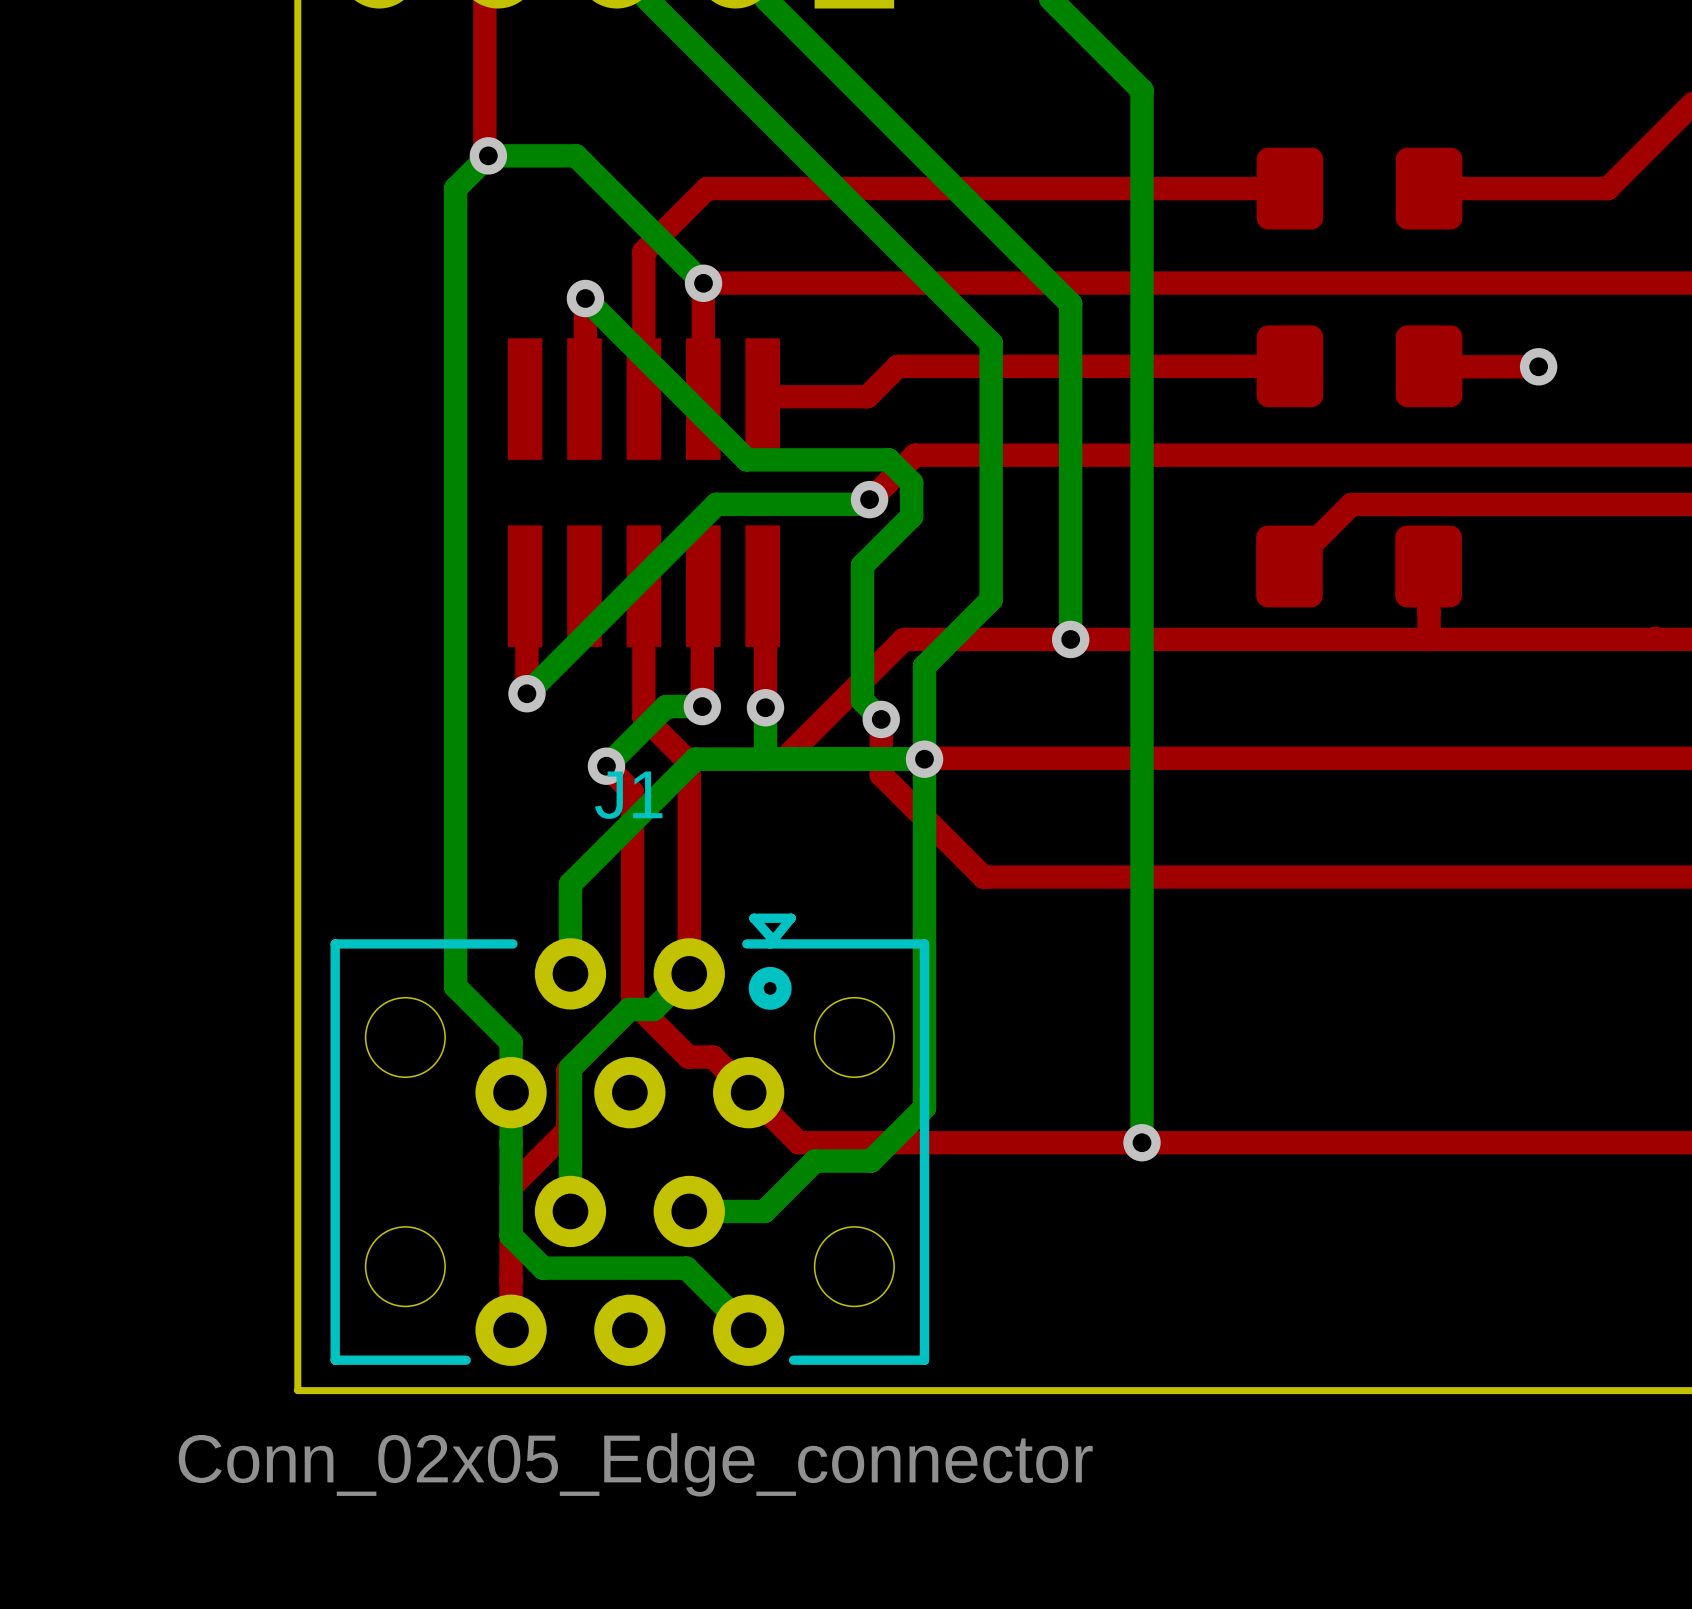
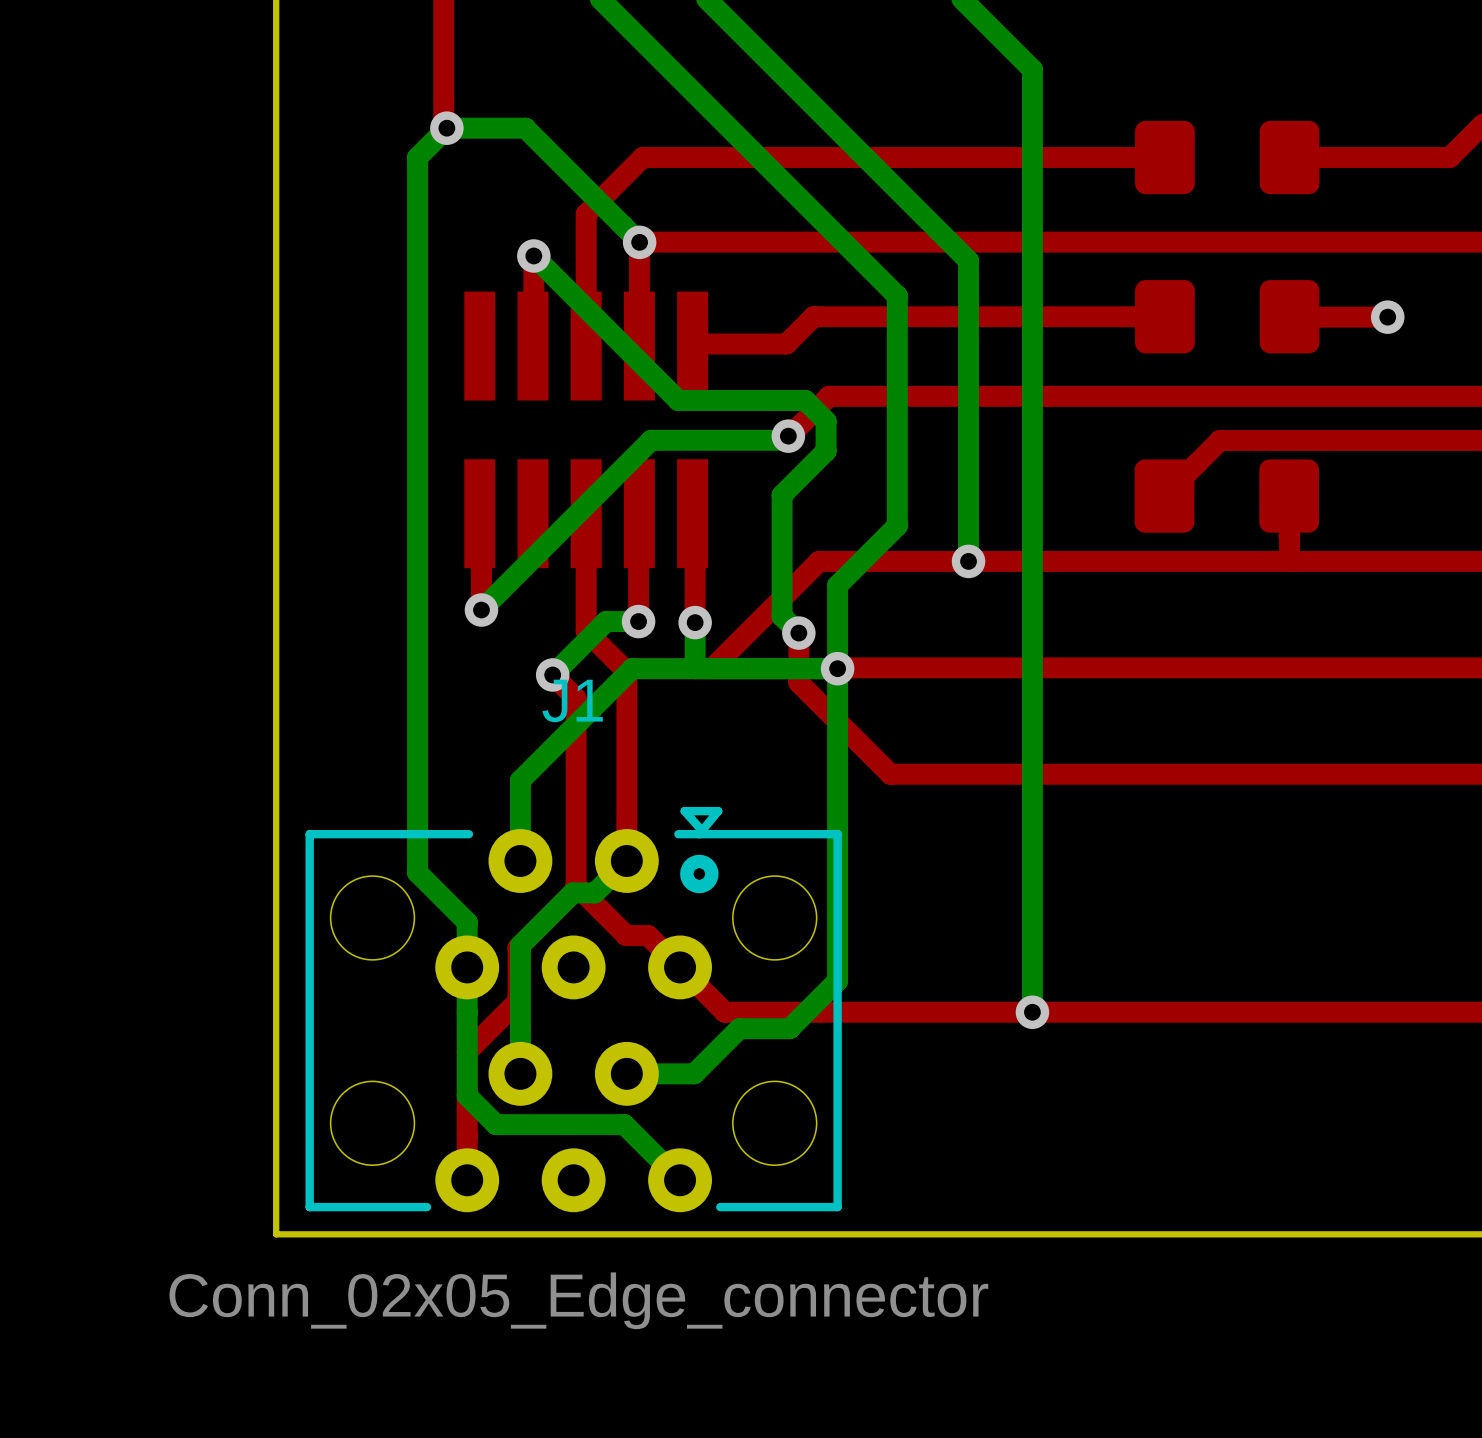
J1 footprint: [330, 913, 930, 1366] -> [305, 806, 842, 1213]

